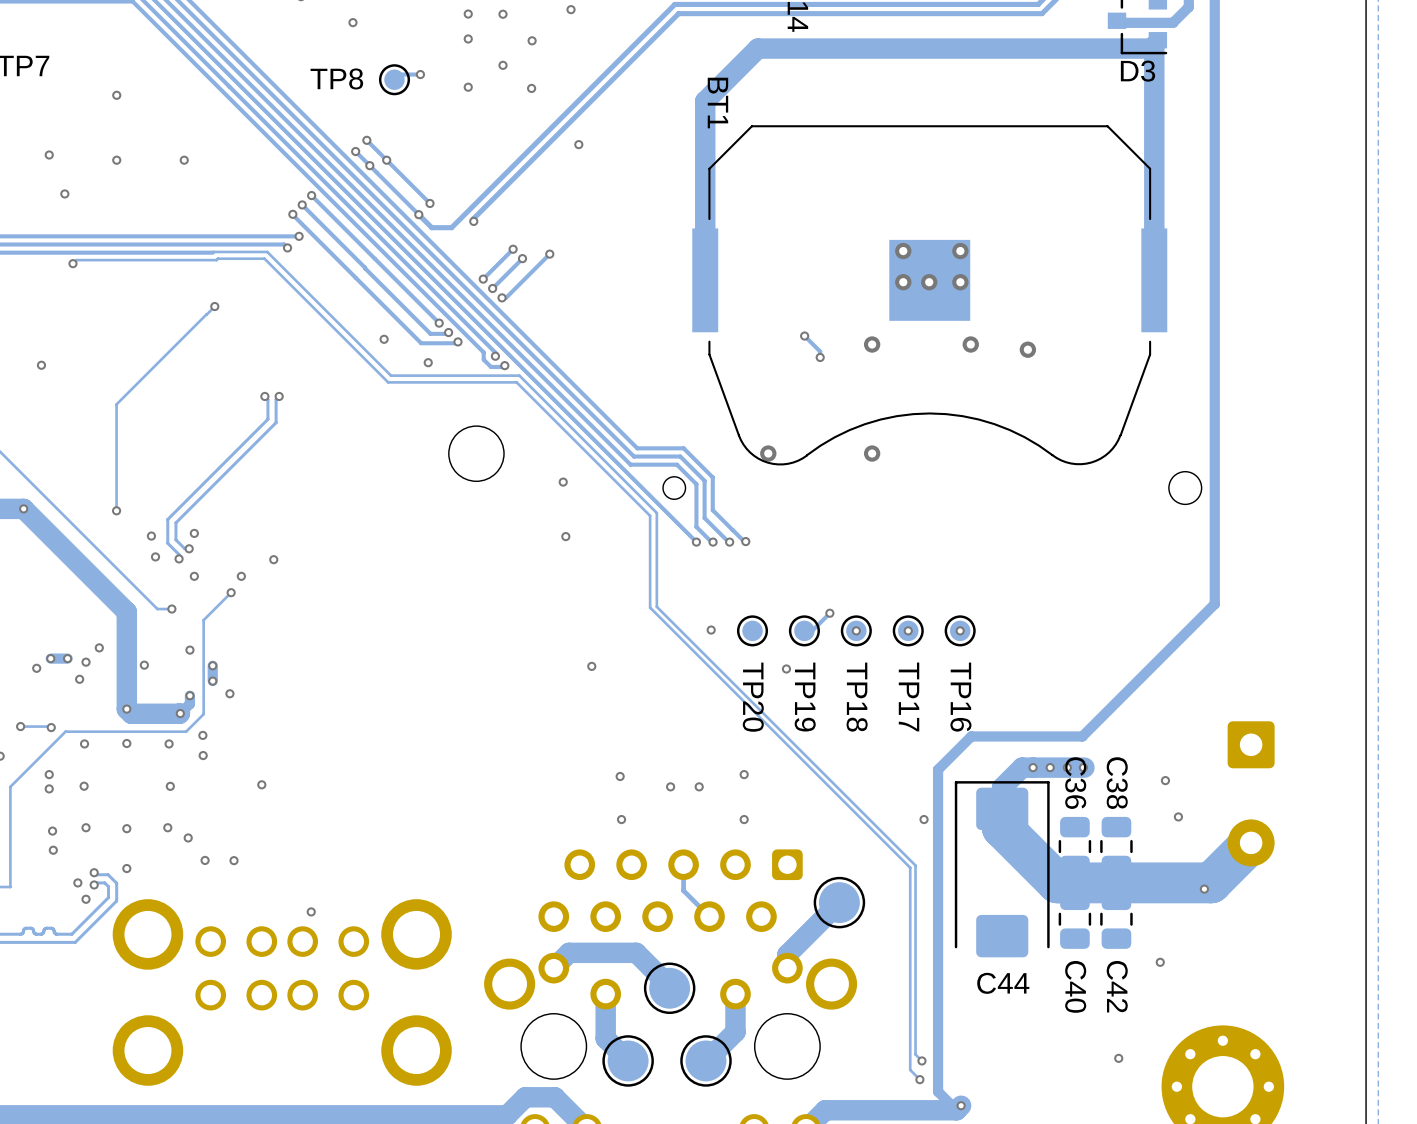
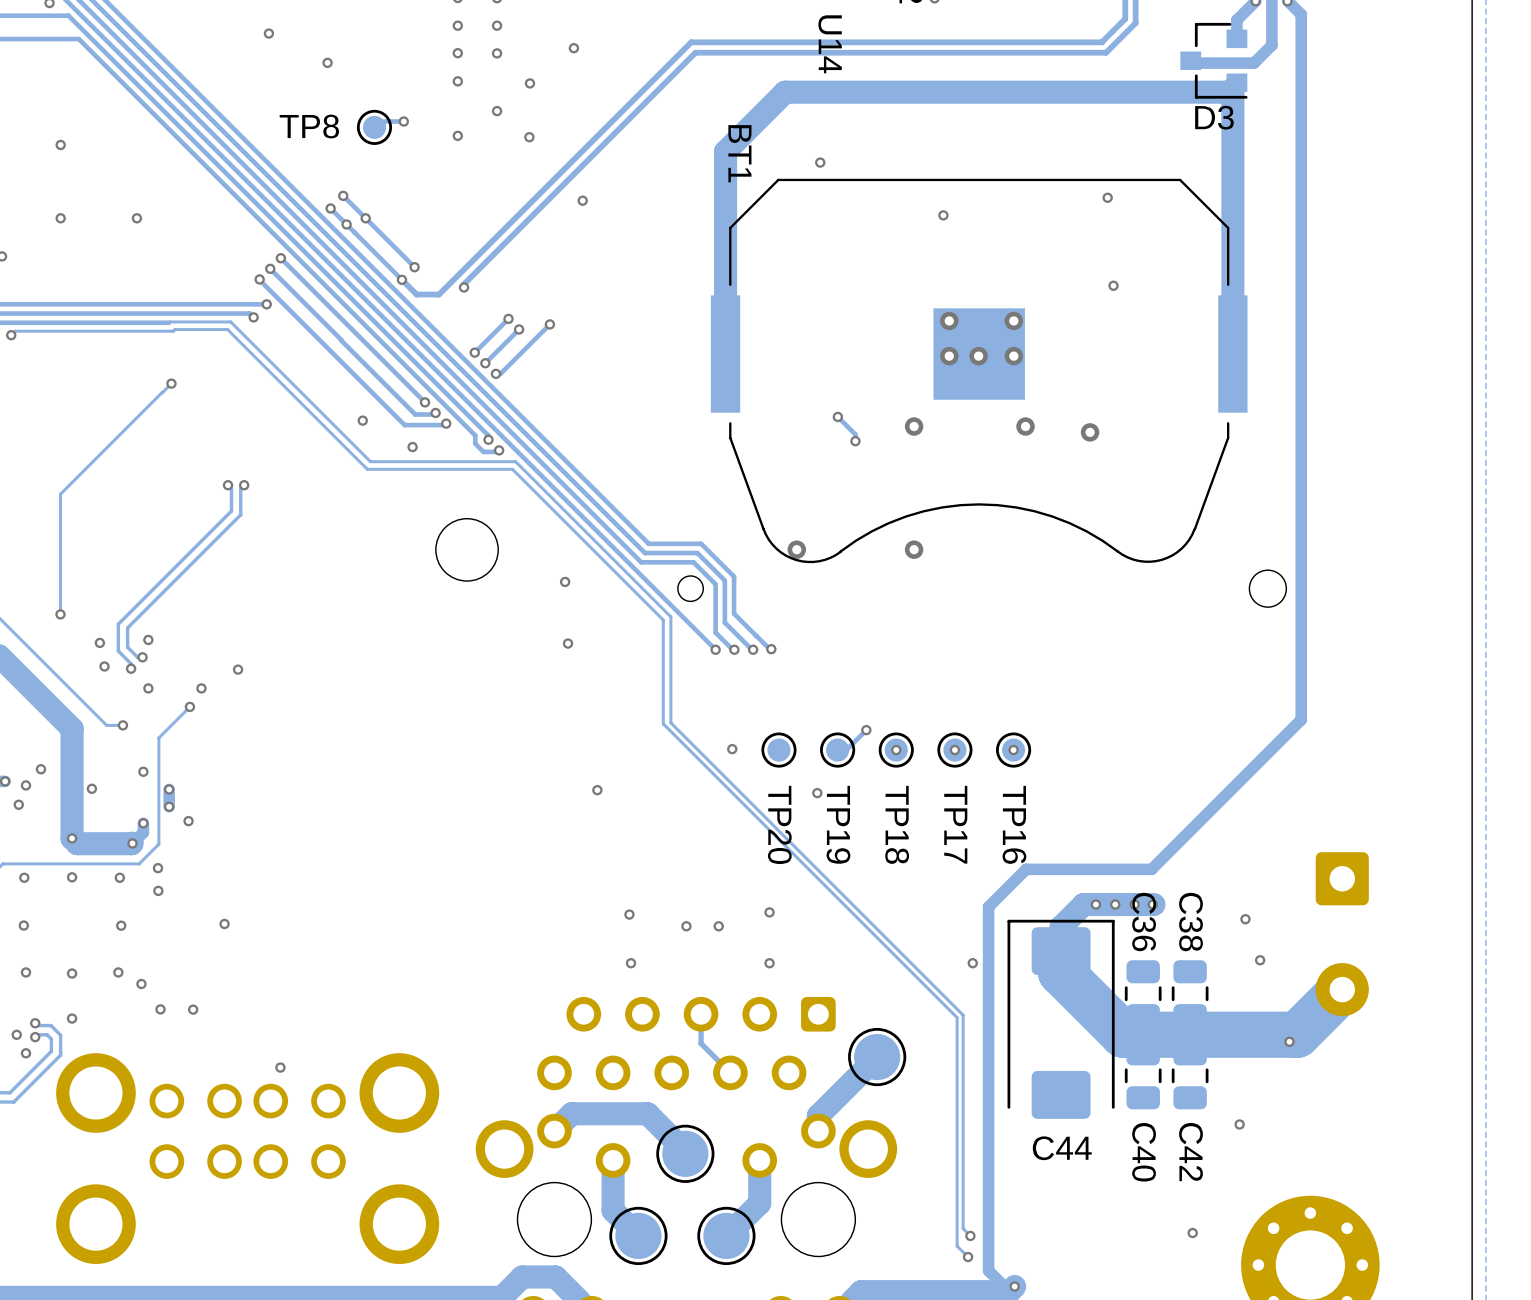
via: none -> (820, 162)
via: none -> (1107, 197)
via: none -> (943, 215)
via: none -> (1113, 285)

